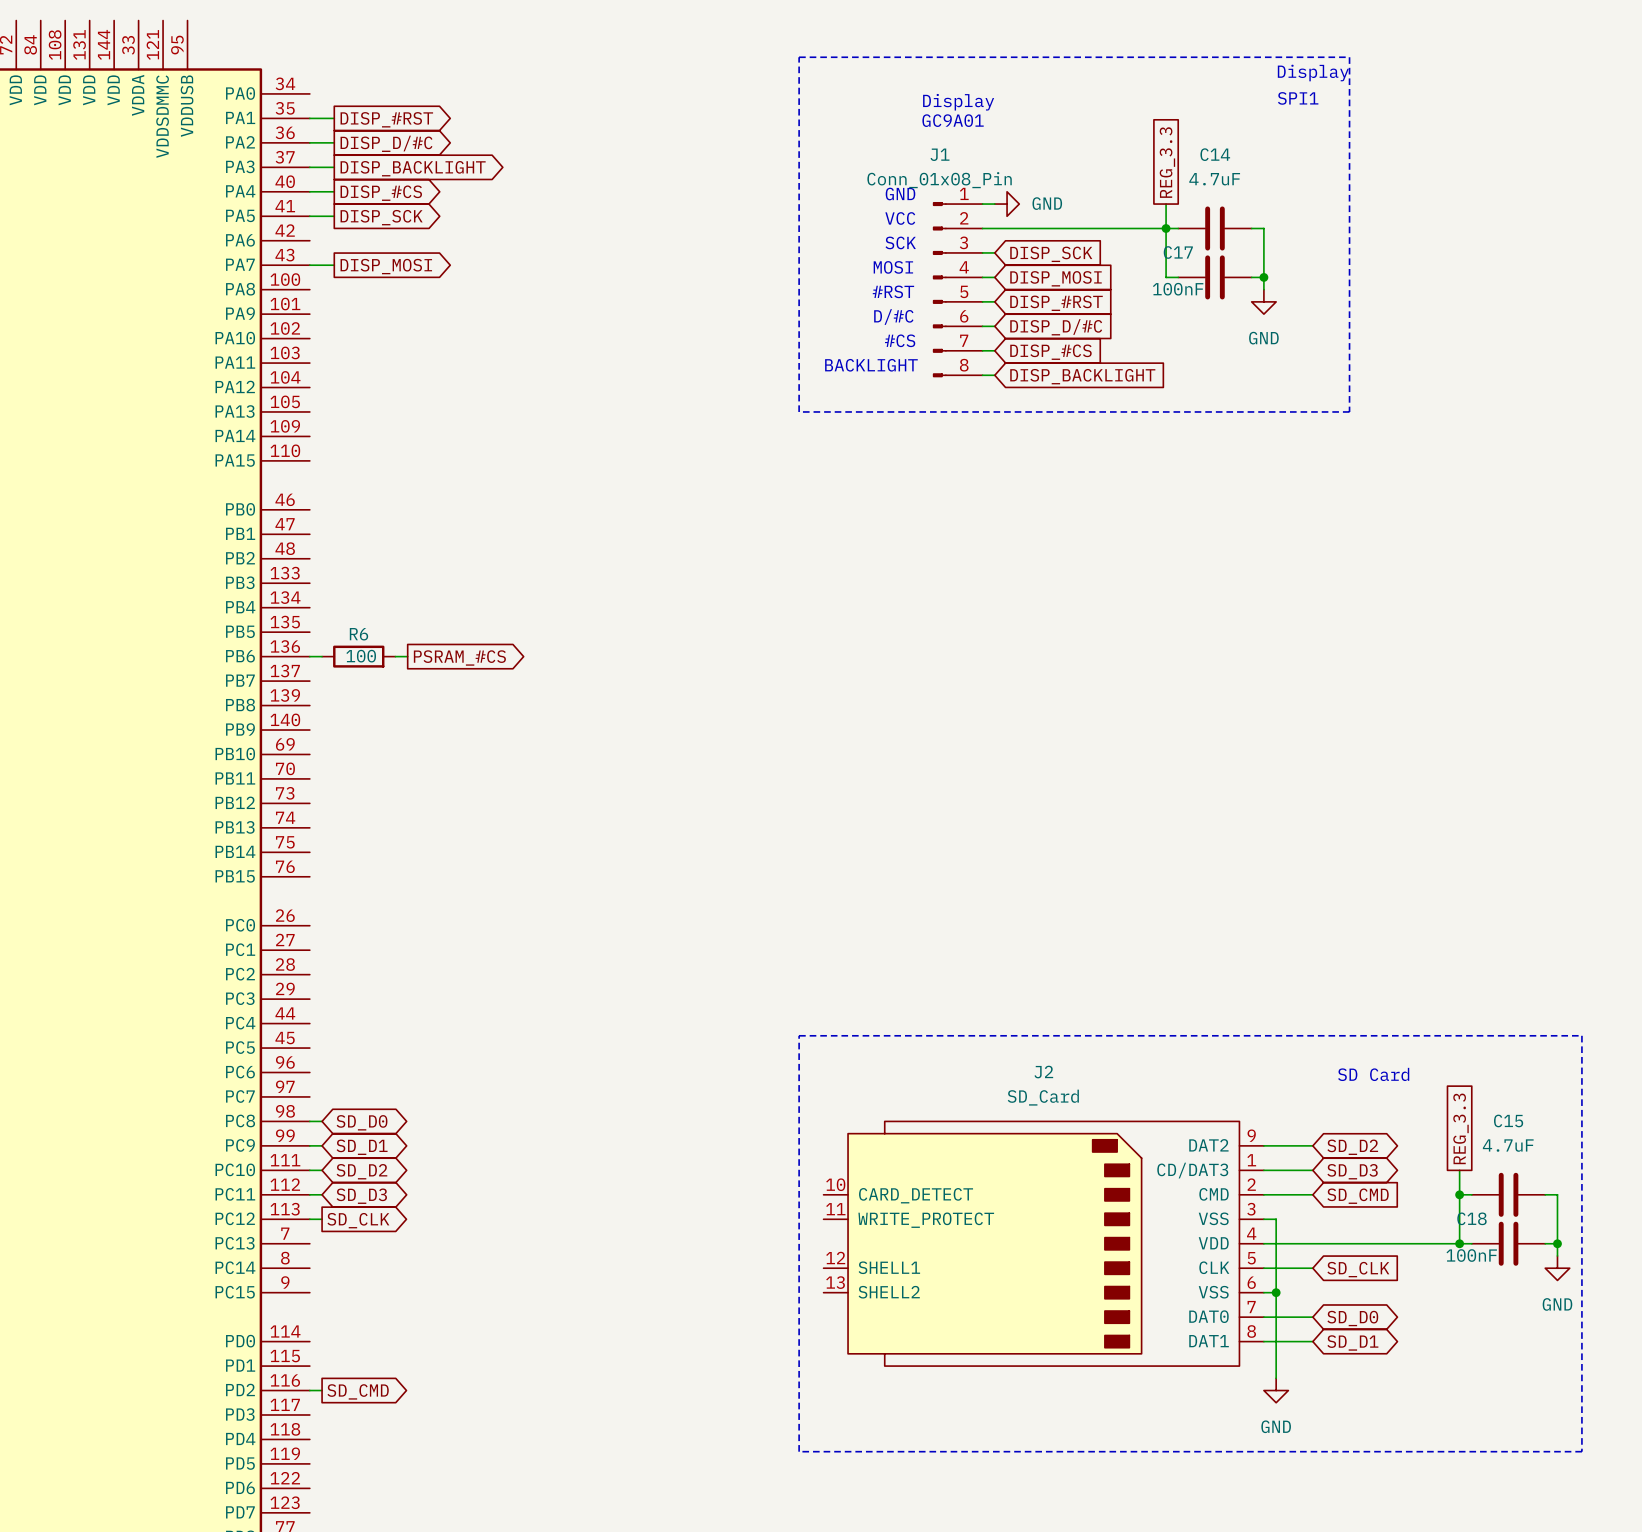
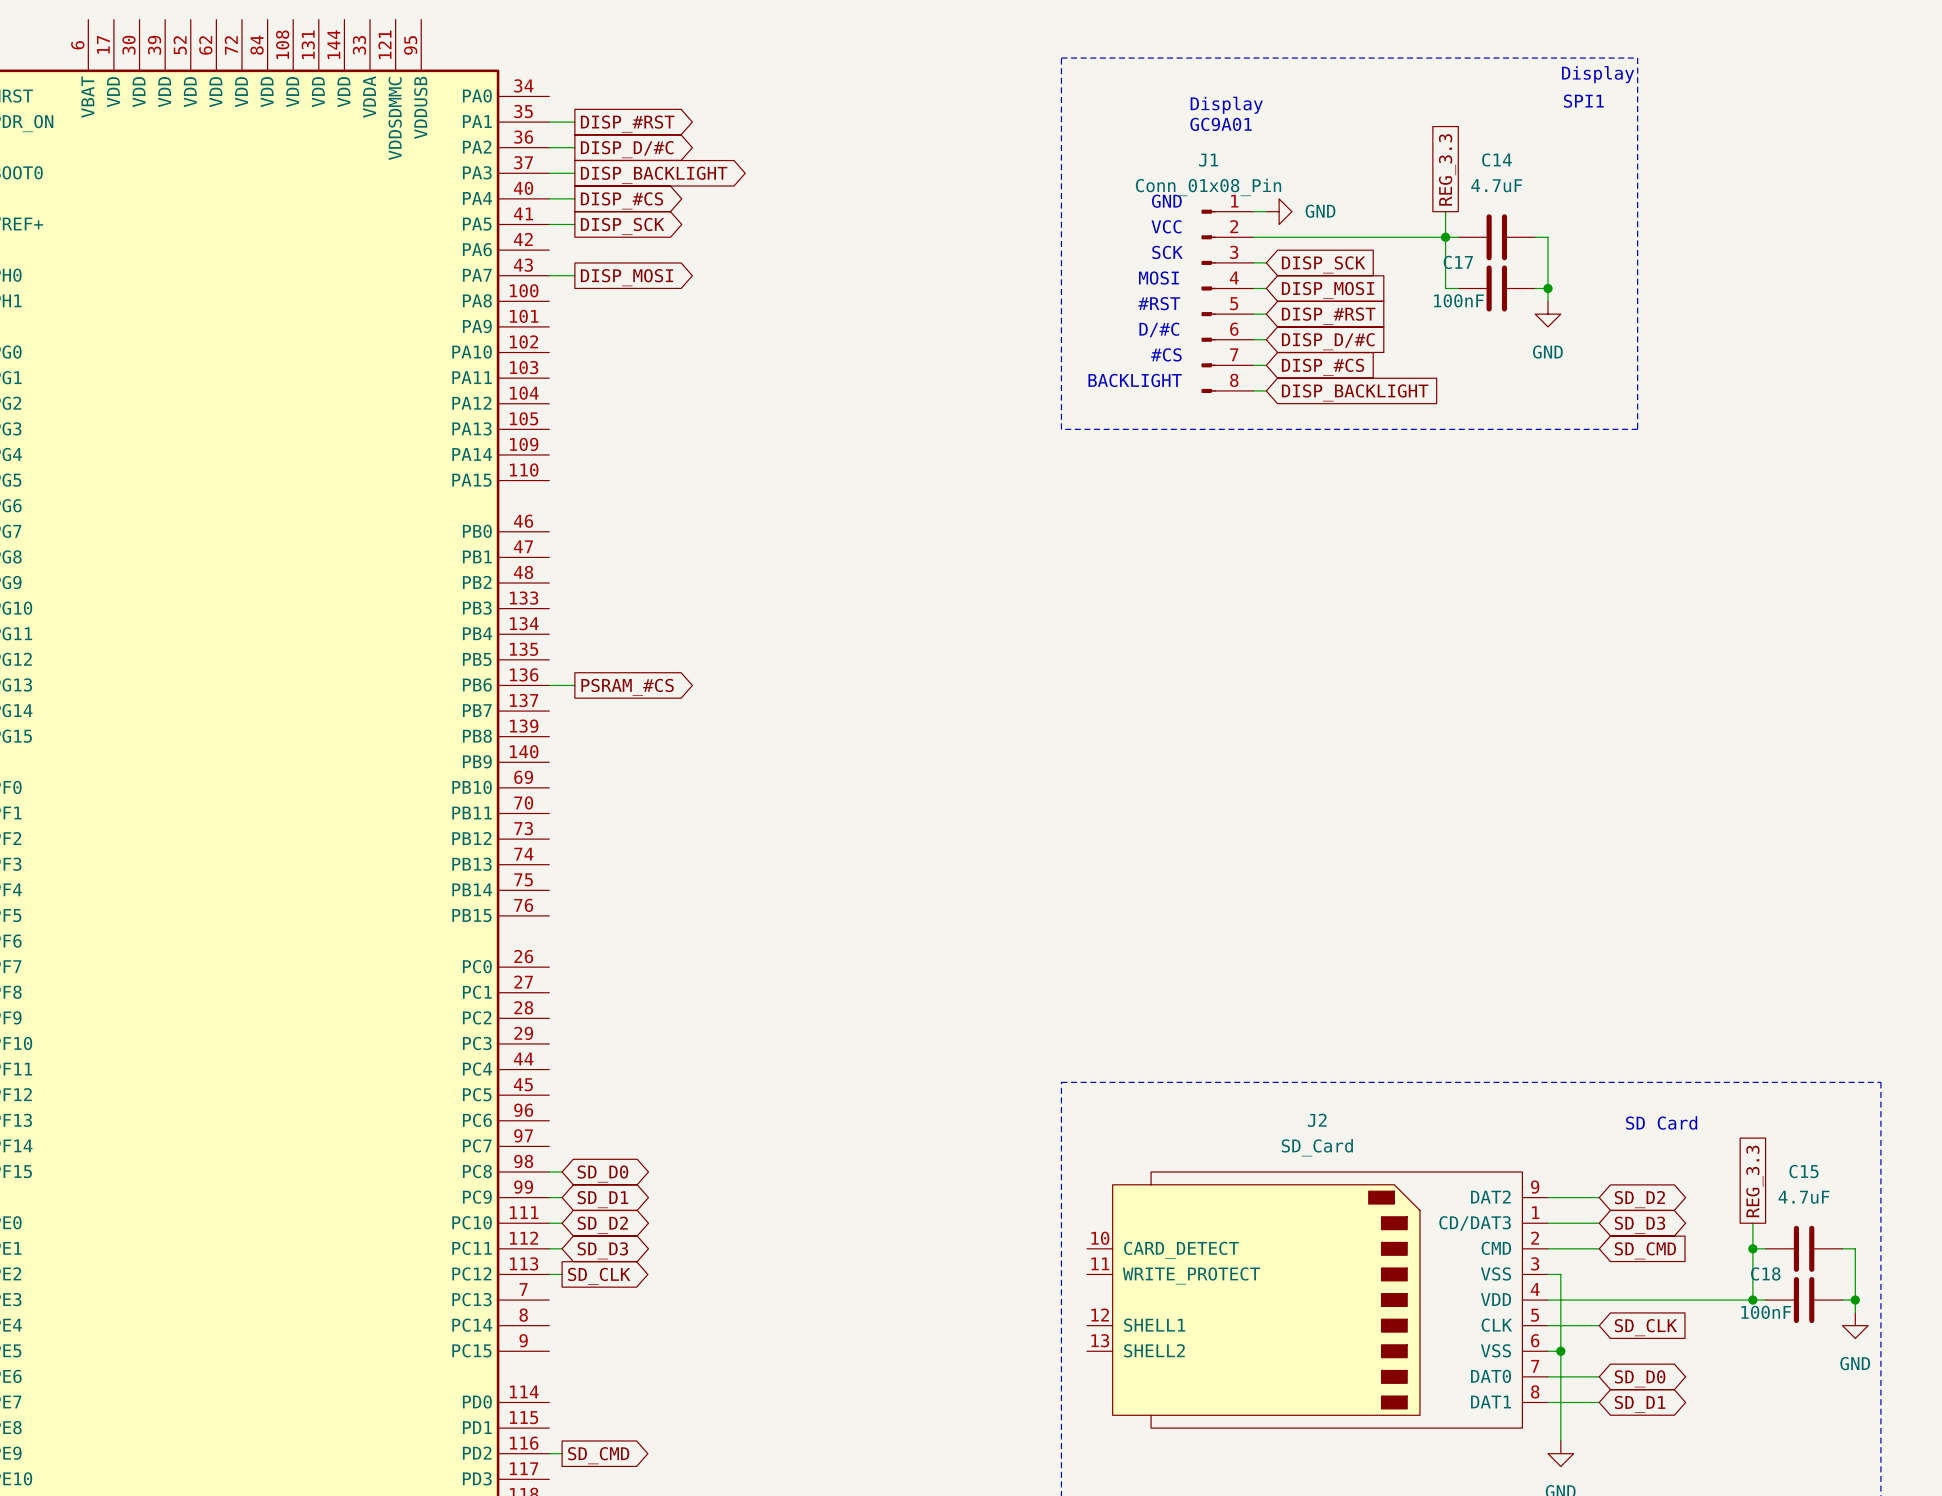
R6: 100 (358, 656) -> none
global label position: PSRAM_#CS (459, 657) -> PSRAM_#CS (627, 687)

